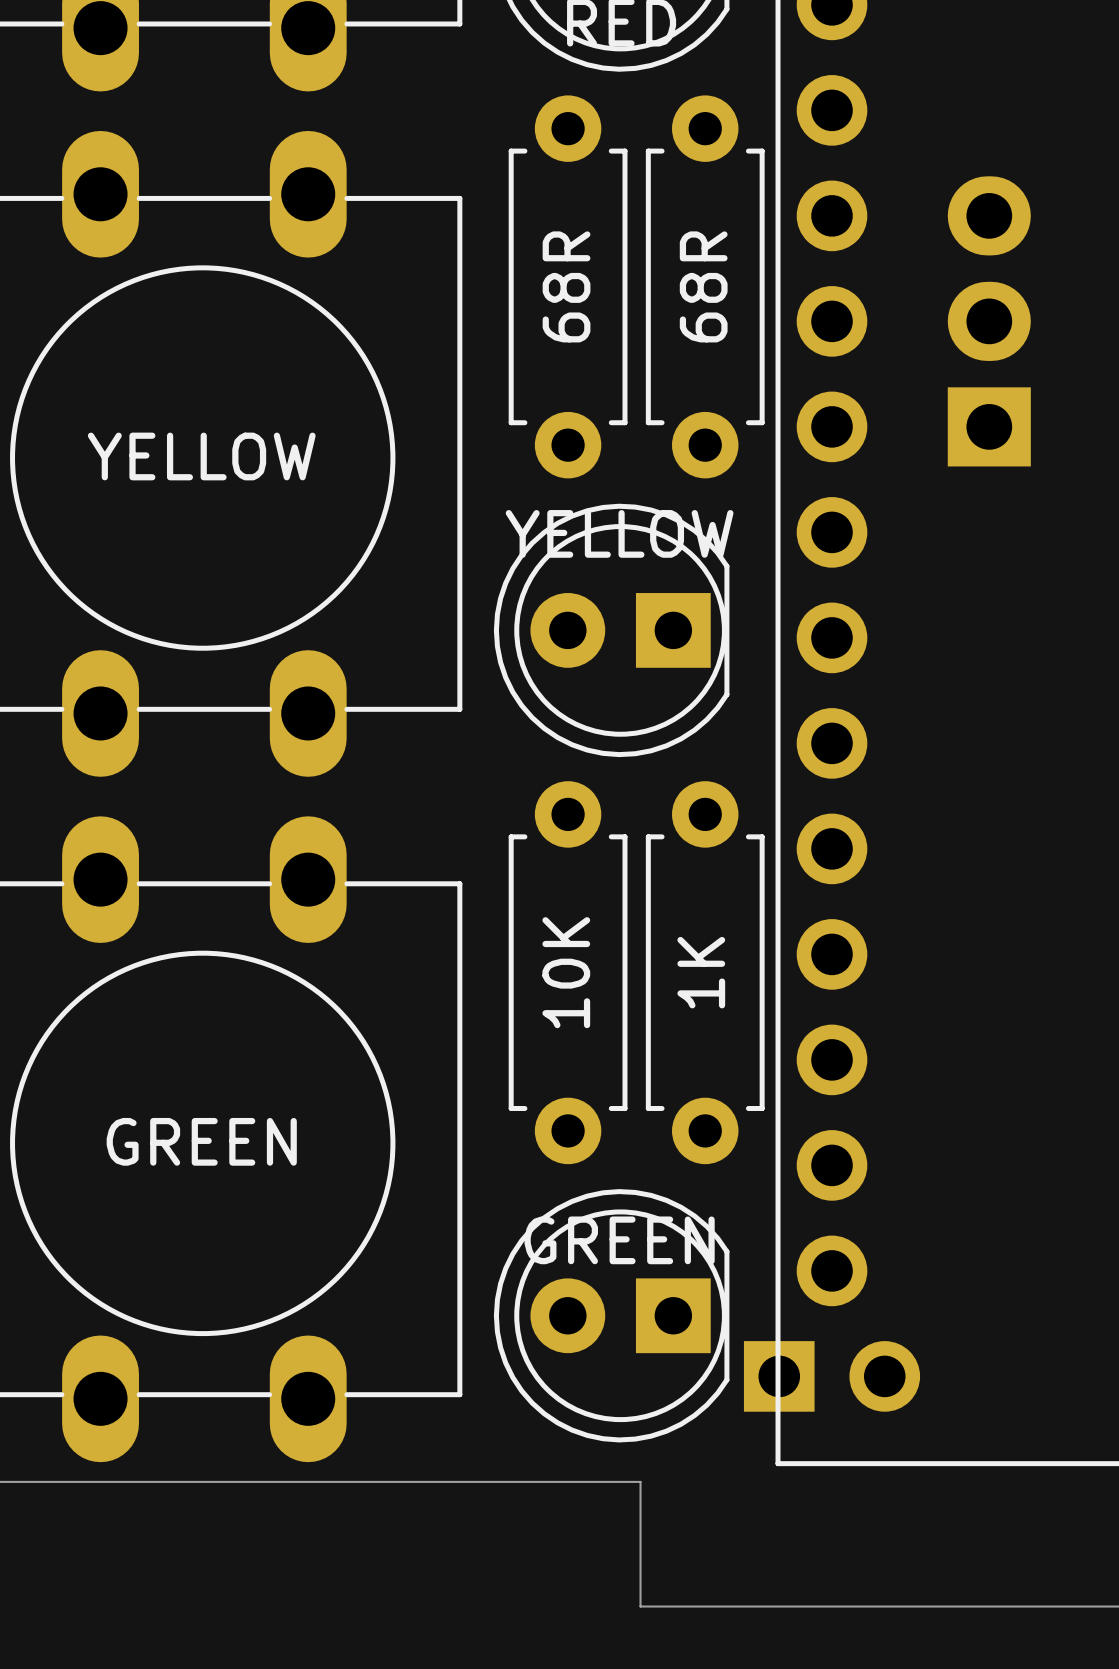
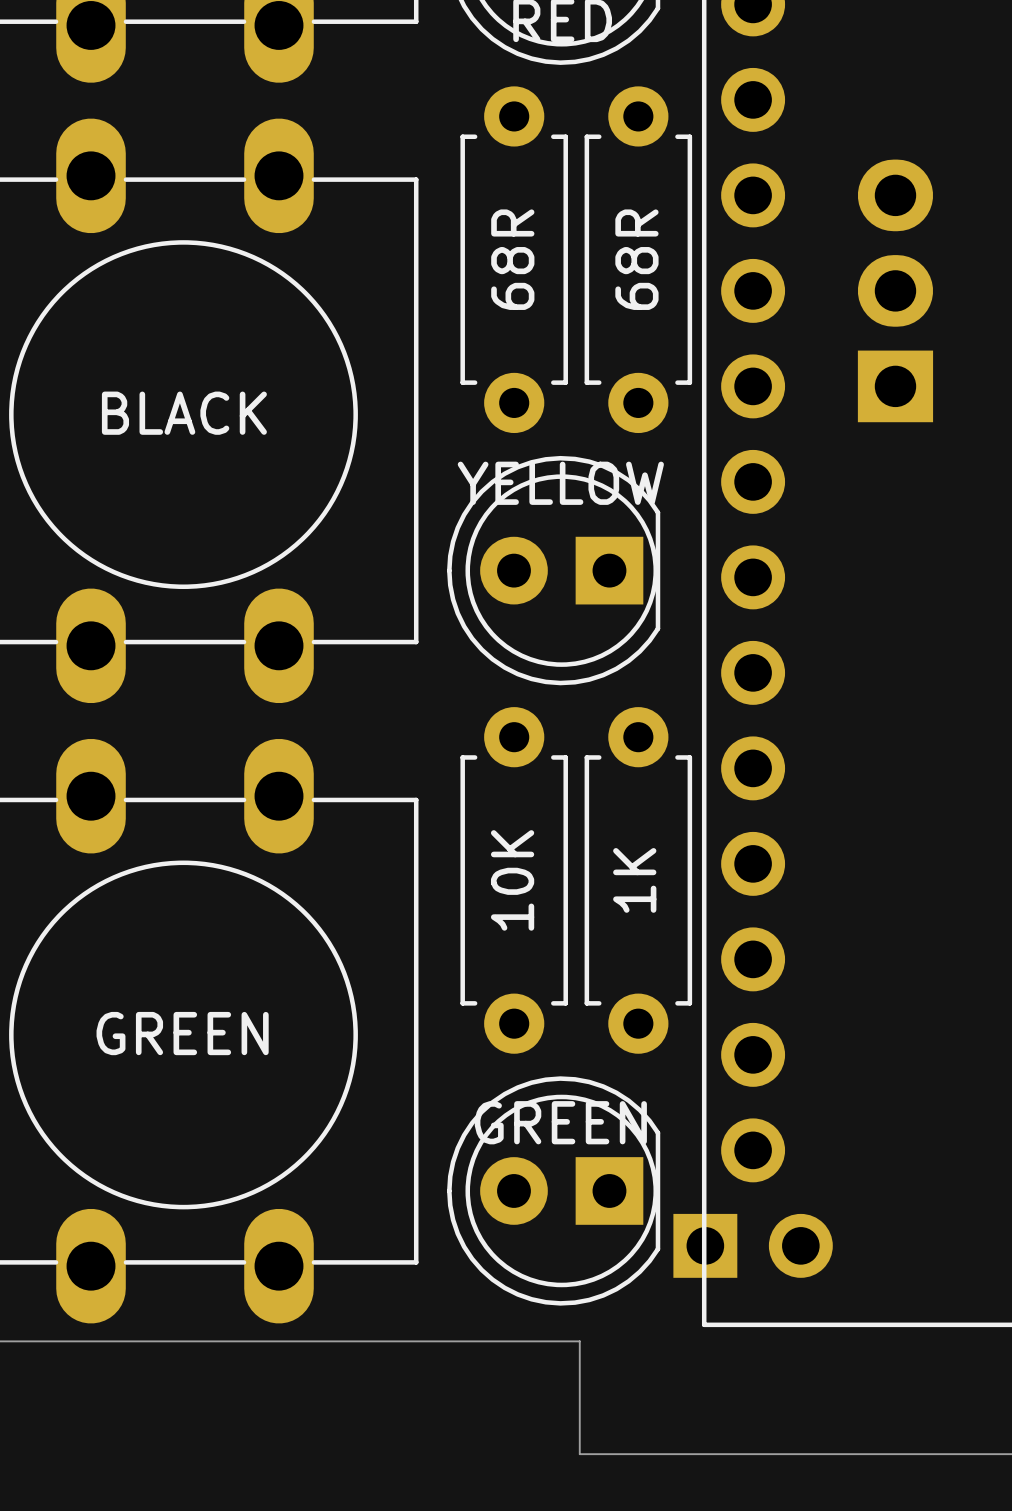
part value: YELLOW (201, 456) -> BLACK (184, 413)

